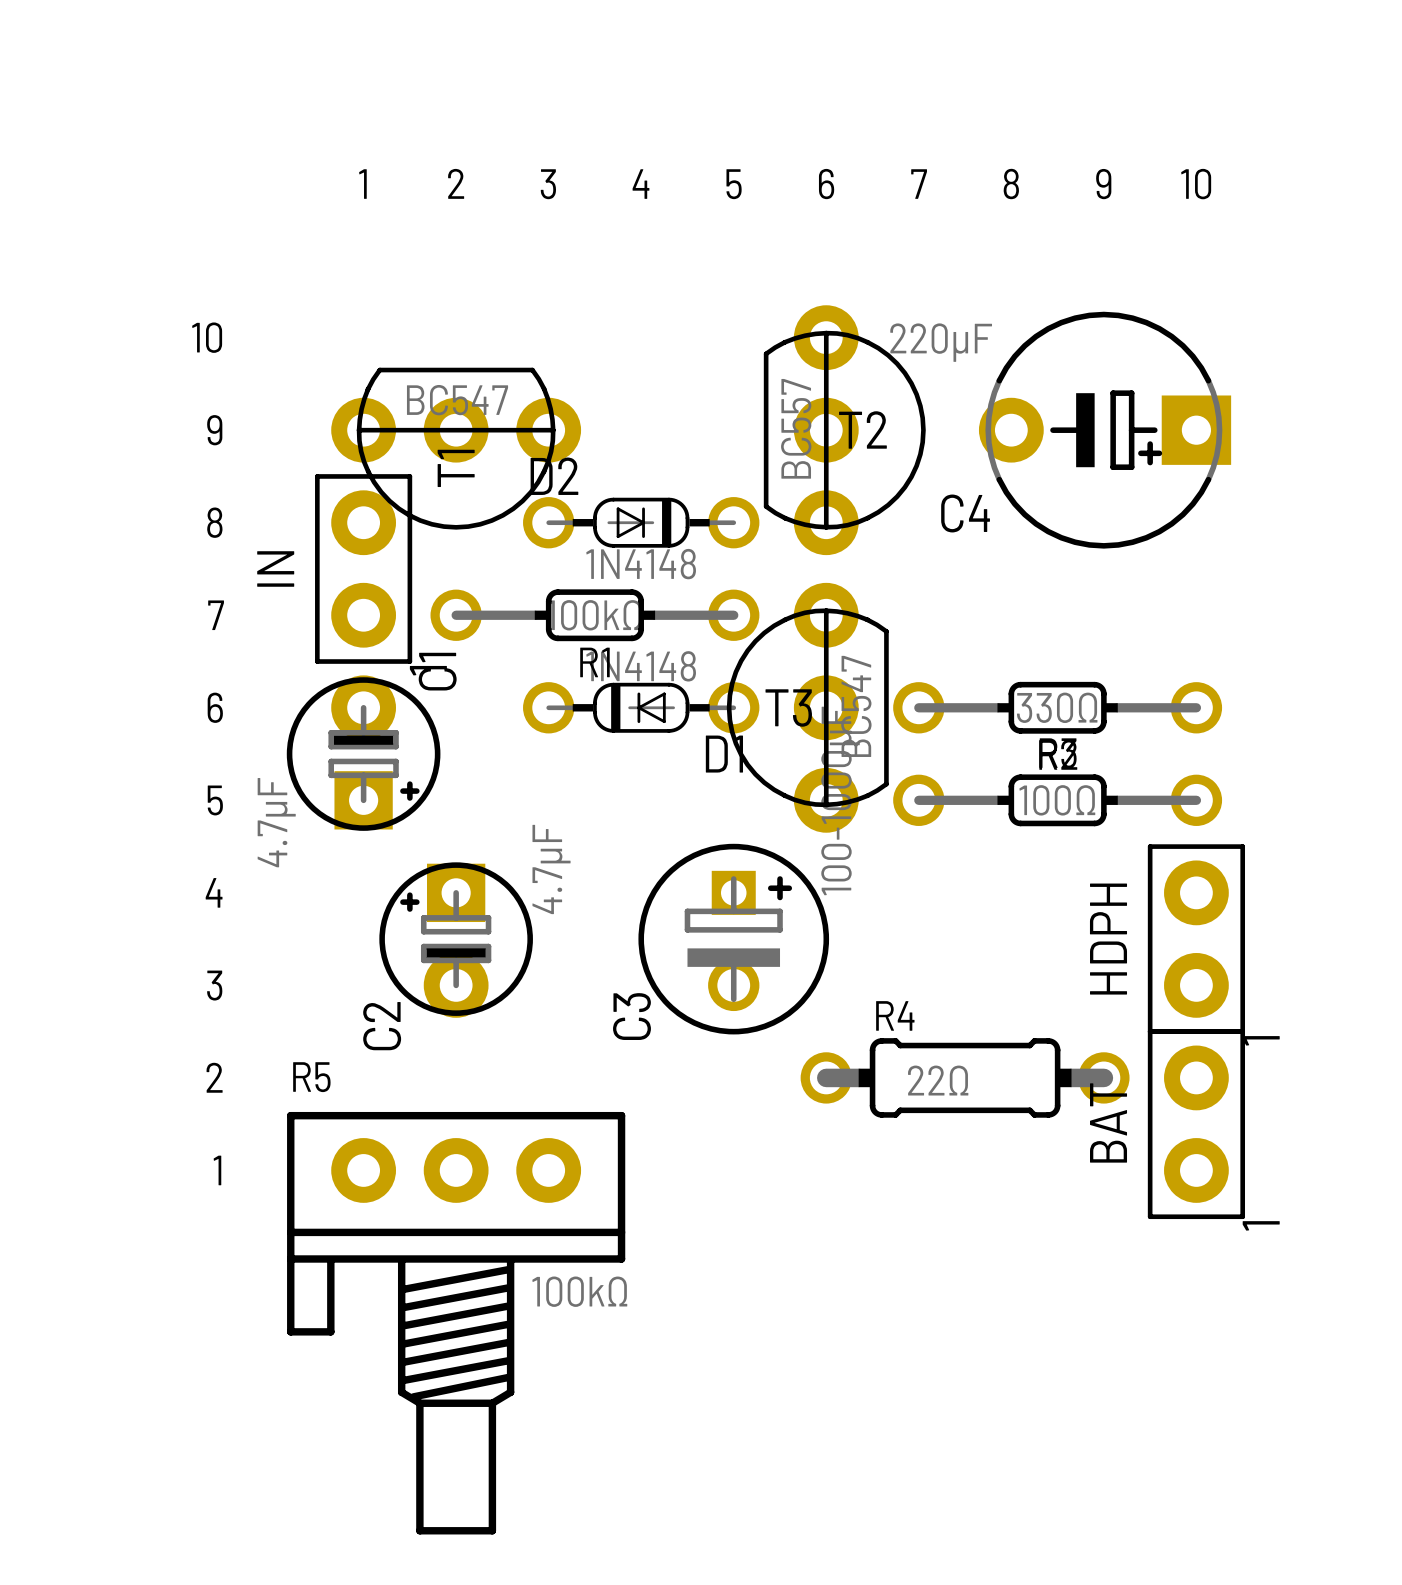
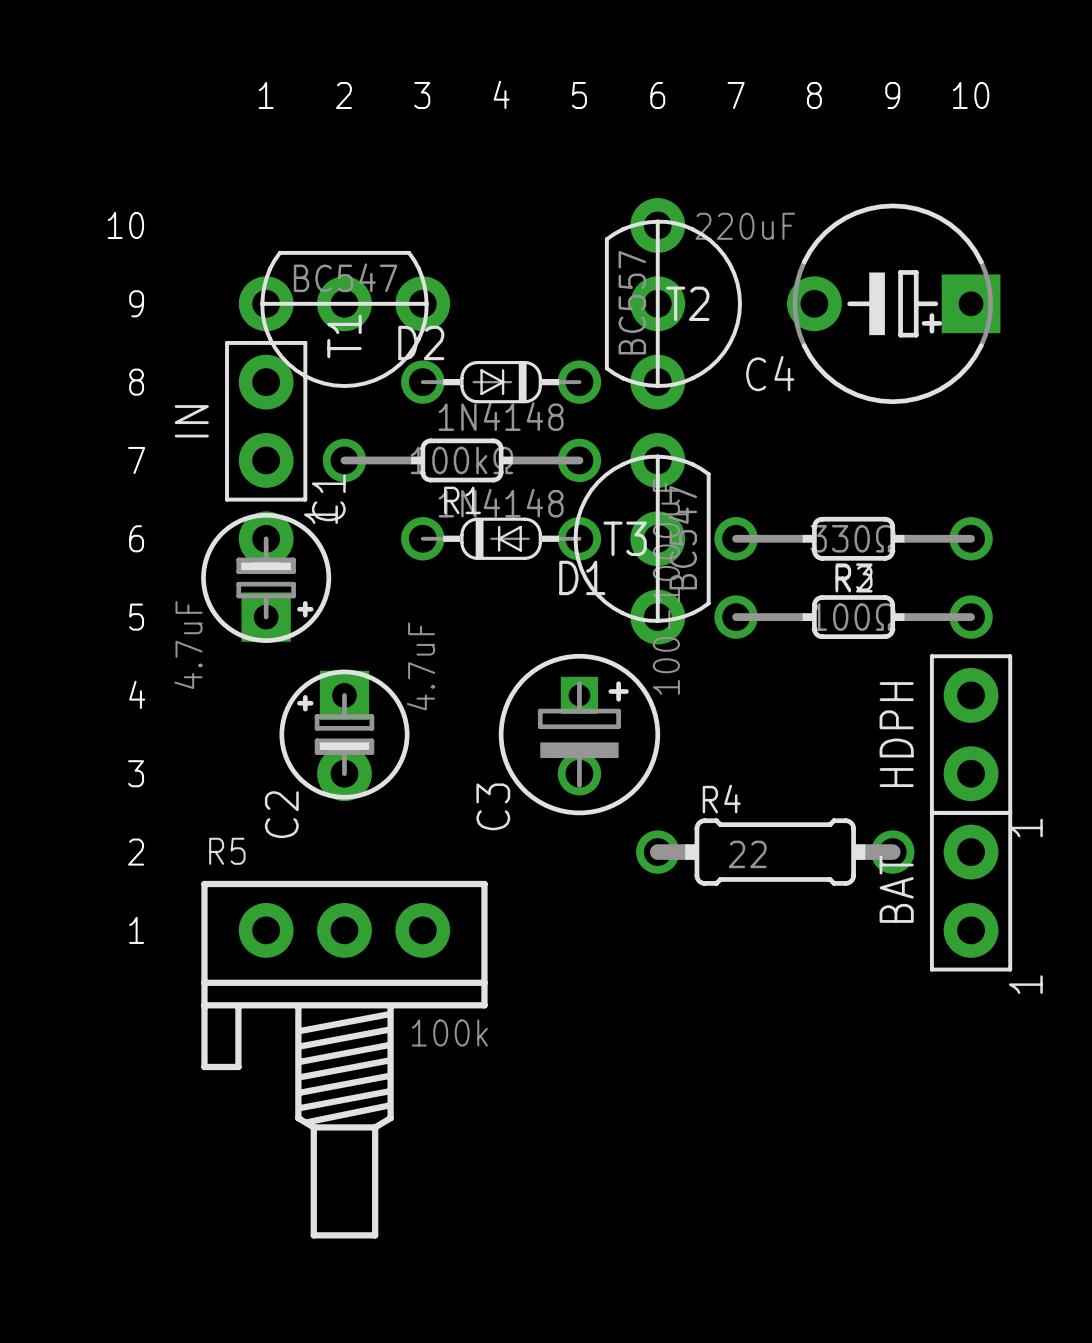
C4 value: 220μF (941, 342) -> 220uF (745, 226)
C1 value: 4.7μF (276, 822) -> 4.7uF (188, 645)
C2 value: 4.7μF (551, 869) -> 4.7uF (421, 666)
R4 value: 22Ω (938, 1080) -> 22 (747, 854)
R5 value: 100kΩ (579, 1291) -> 100k (449, 1032)

